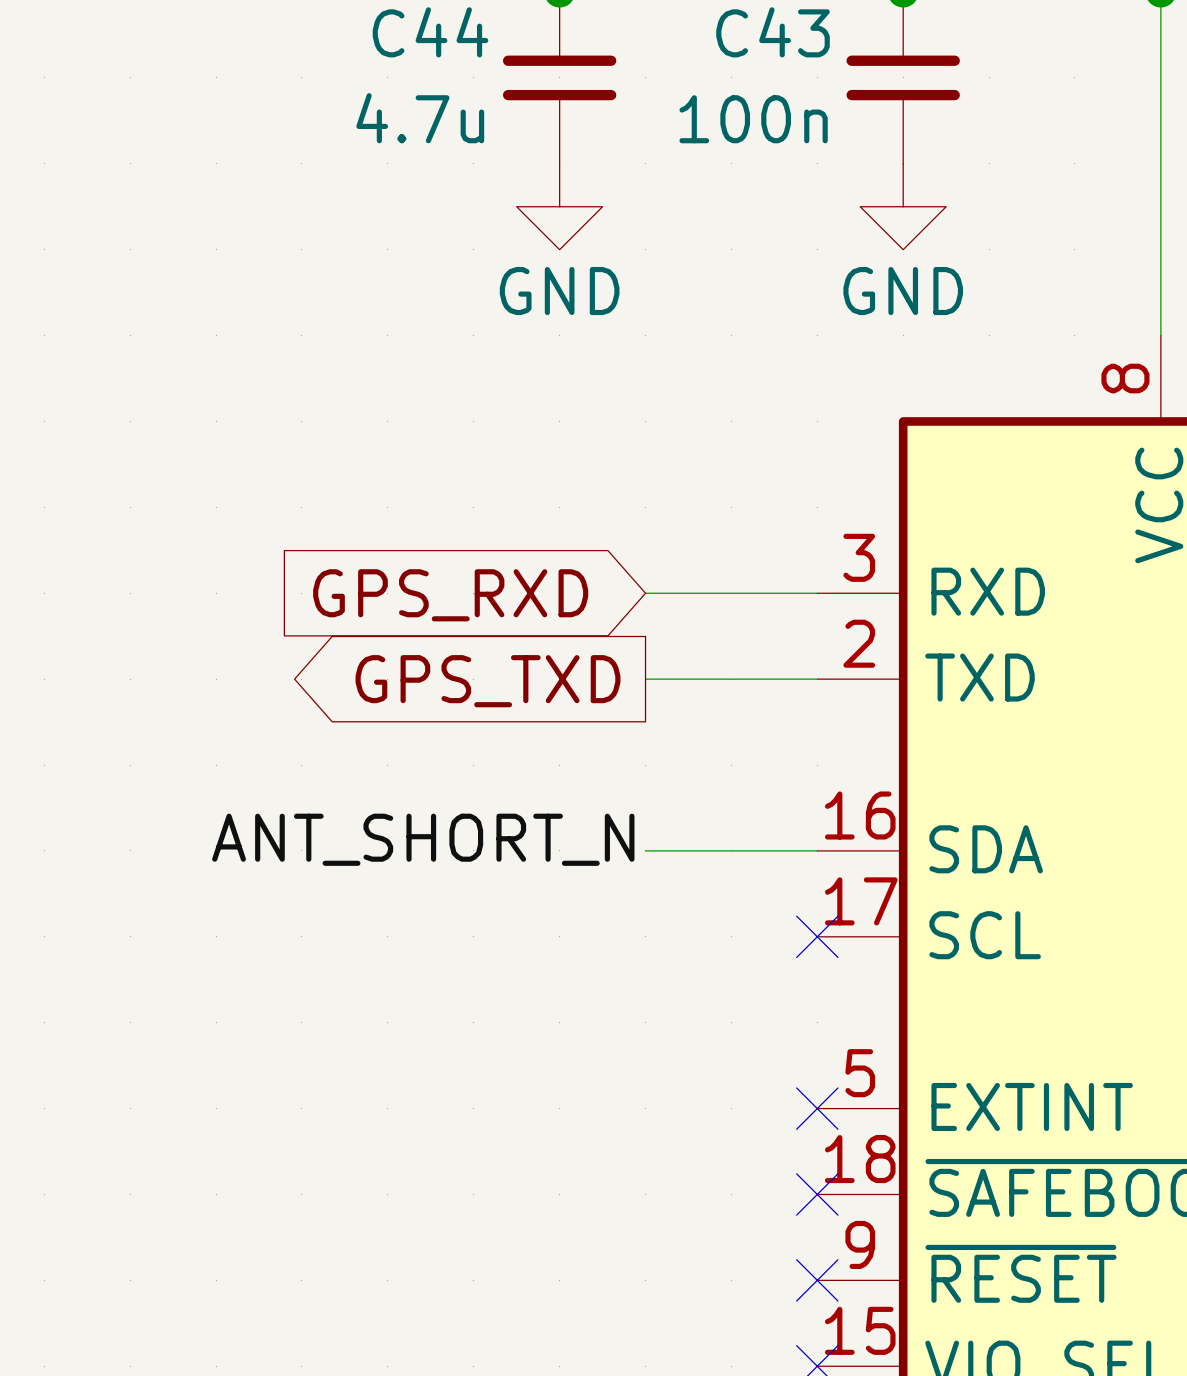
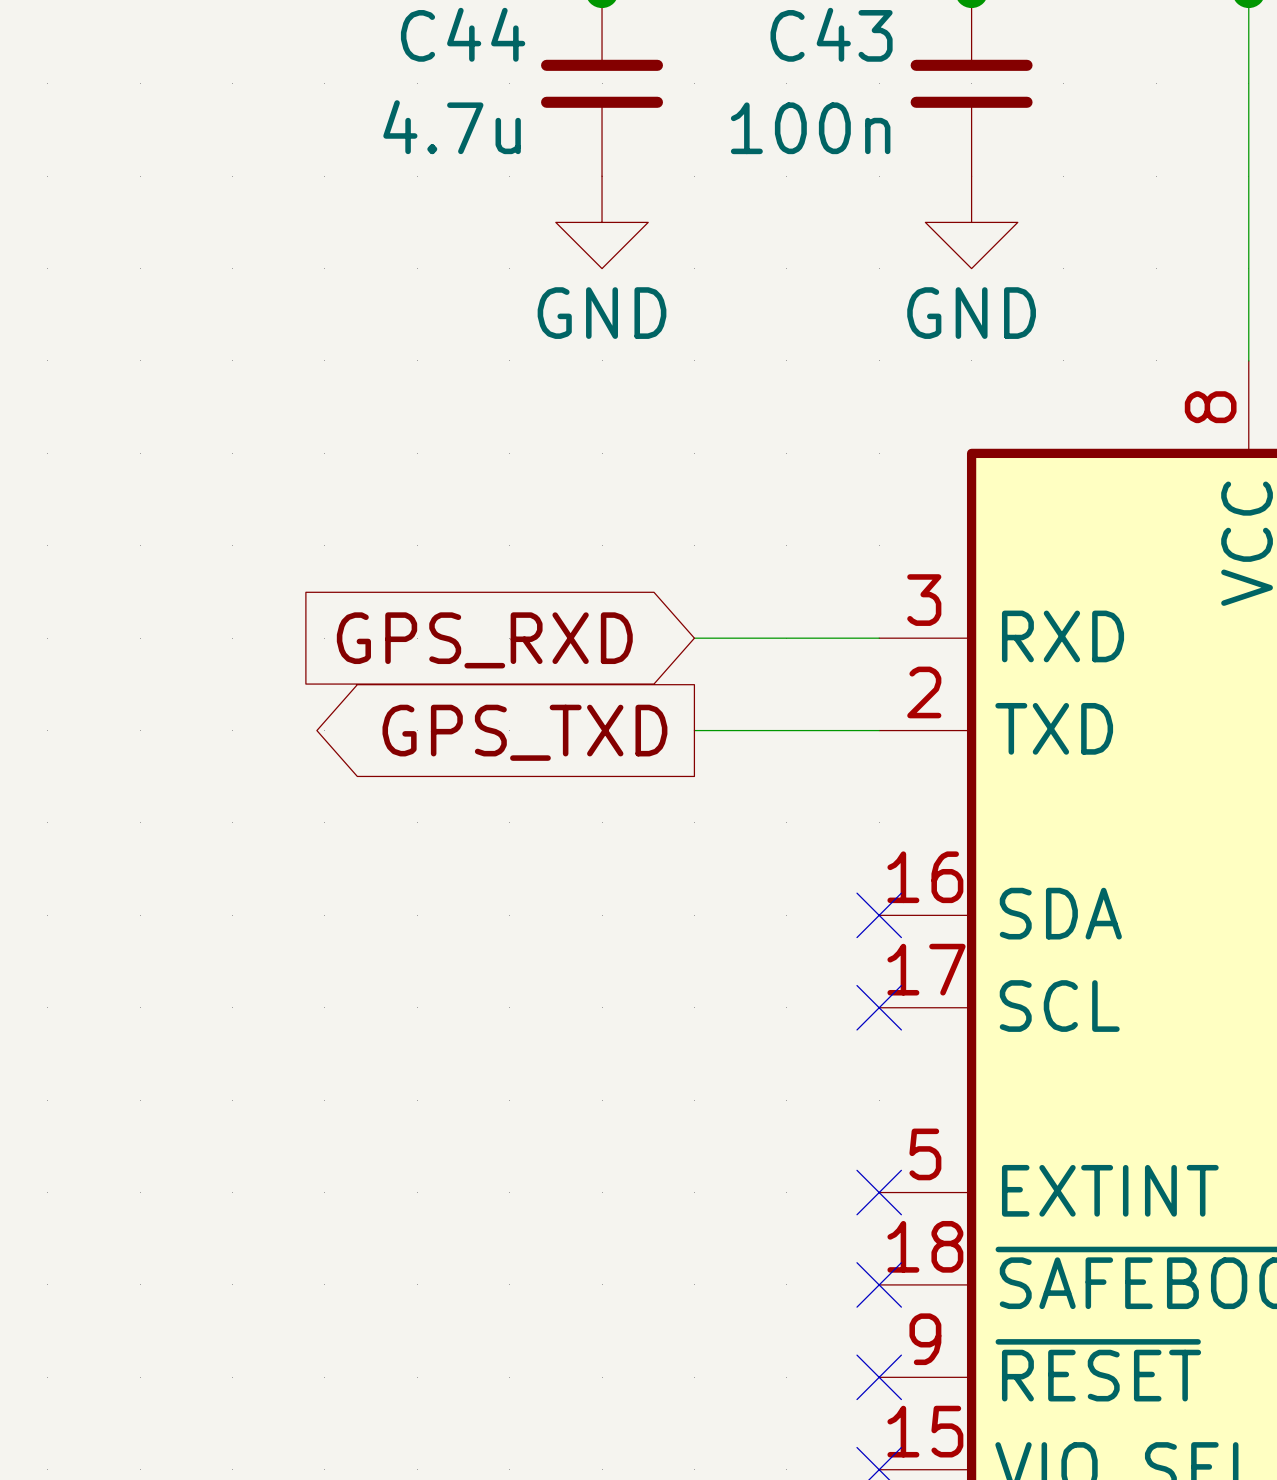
label: ANT_SHORT_N (423, 839) -> none
wire: (645, 850) (817, 850) -> none
no-connect mark: none -> (879, 915)

